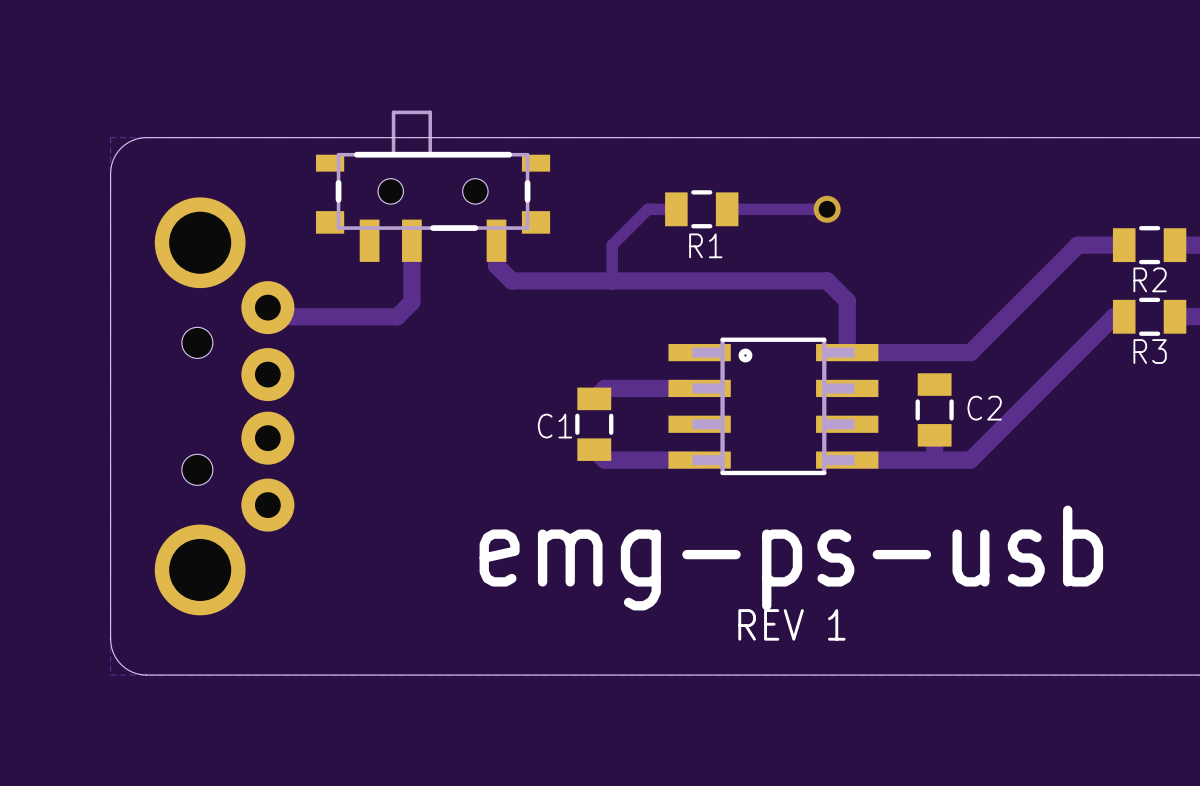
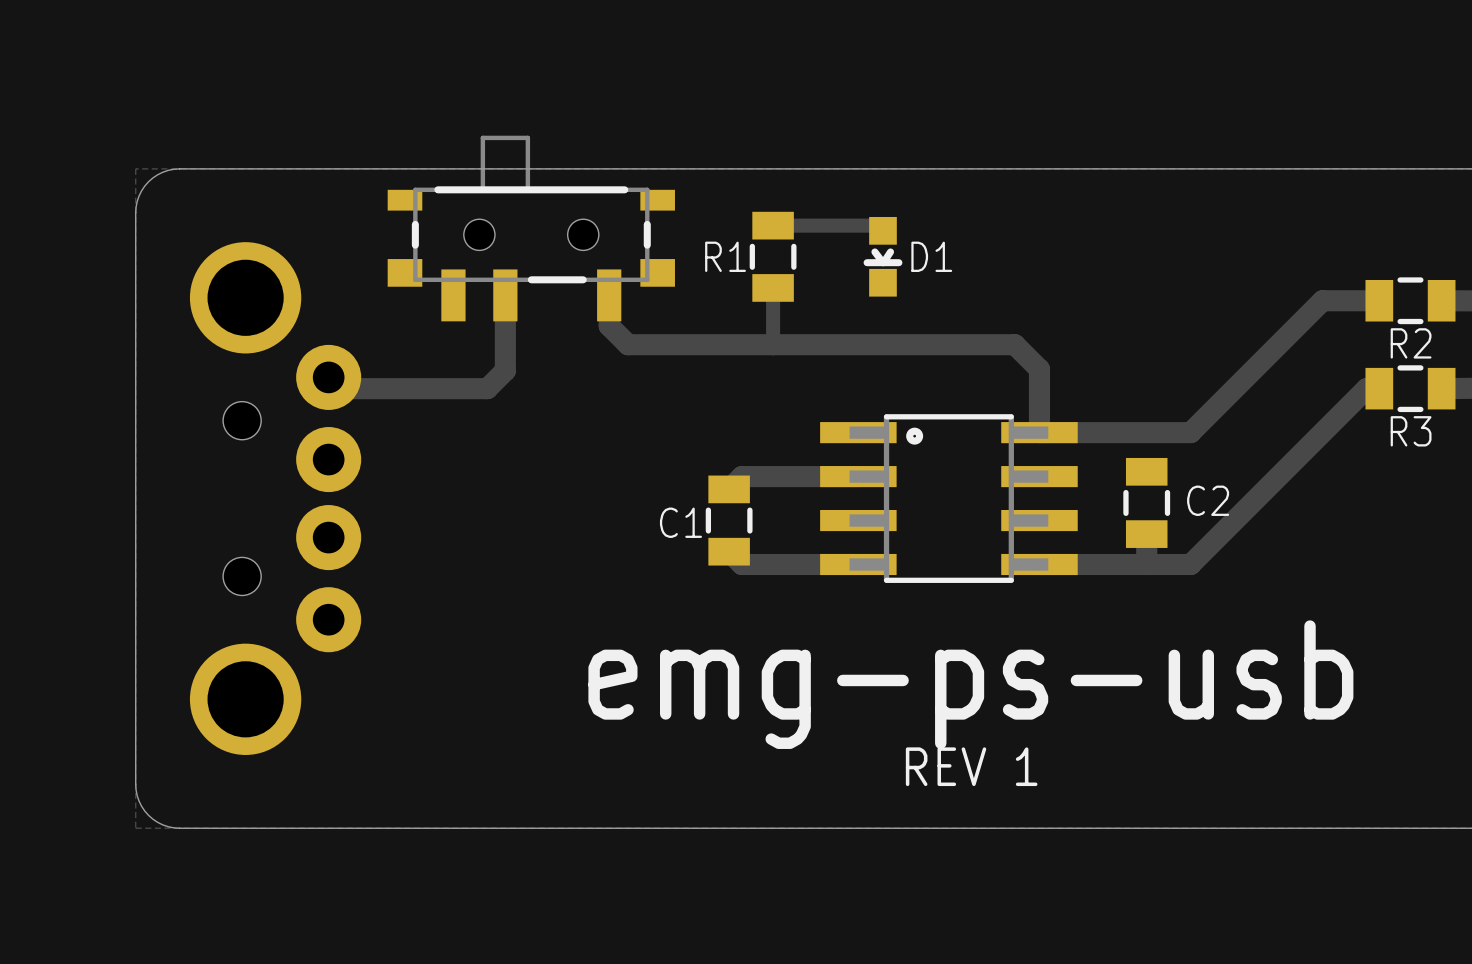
track: none -> (773, 225) (877, 225) (882, 230)
track: (676, 209) (648, 209) (612, 245) (612, 280) -> none
R1 rotation: 0° (701, 209) -> 90° clockwise (773, 256)
R1 position: (701, 209) -> (773, 256)
part: none -> (882, 256)
track: (727, 209) (827, 209) -> none
text: none -> D1 (931, 256)
via: (827, 209) -> none
track: none -> (773, 287) (773, 344)

